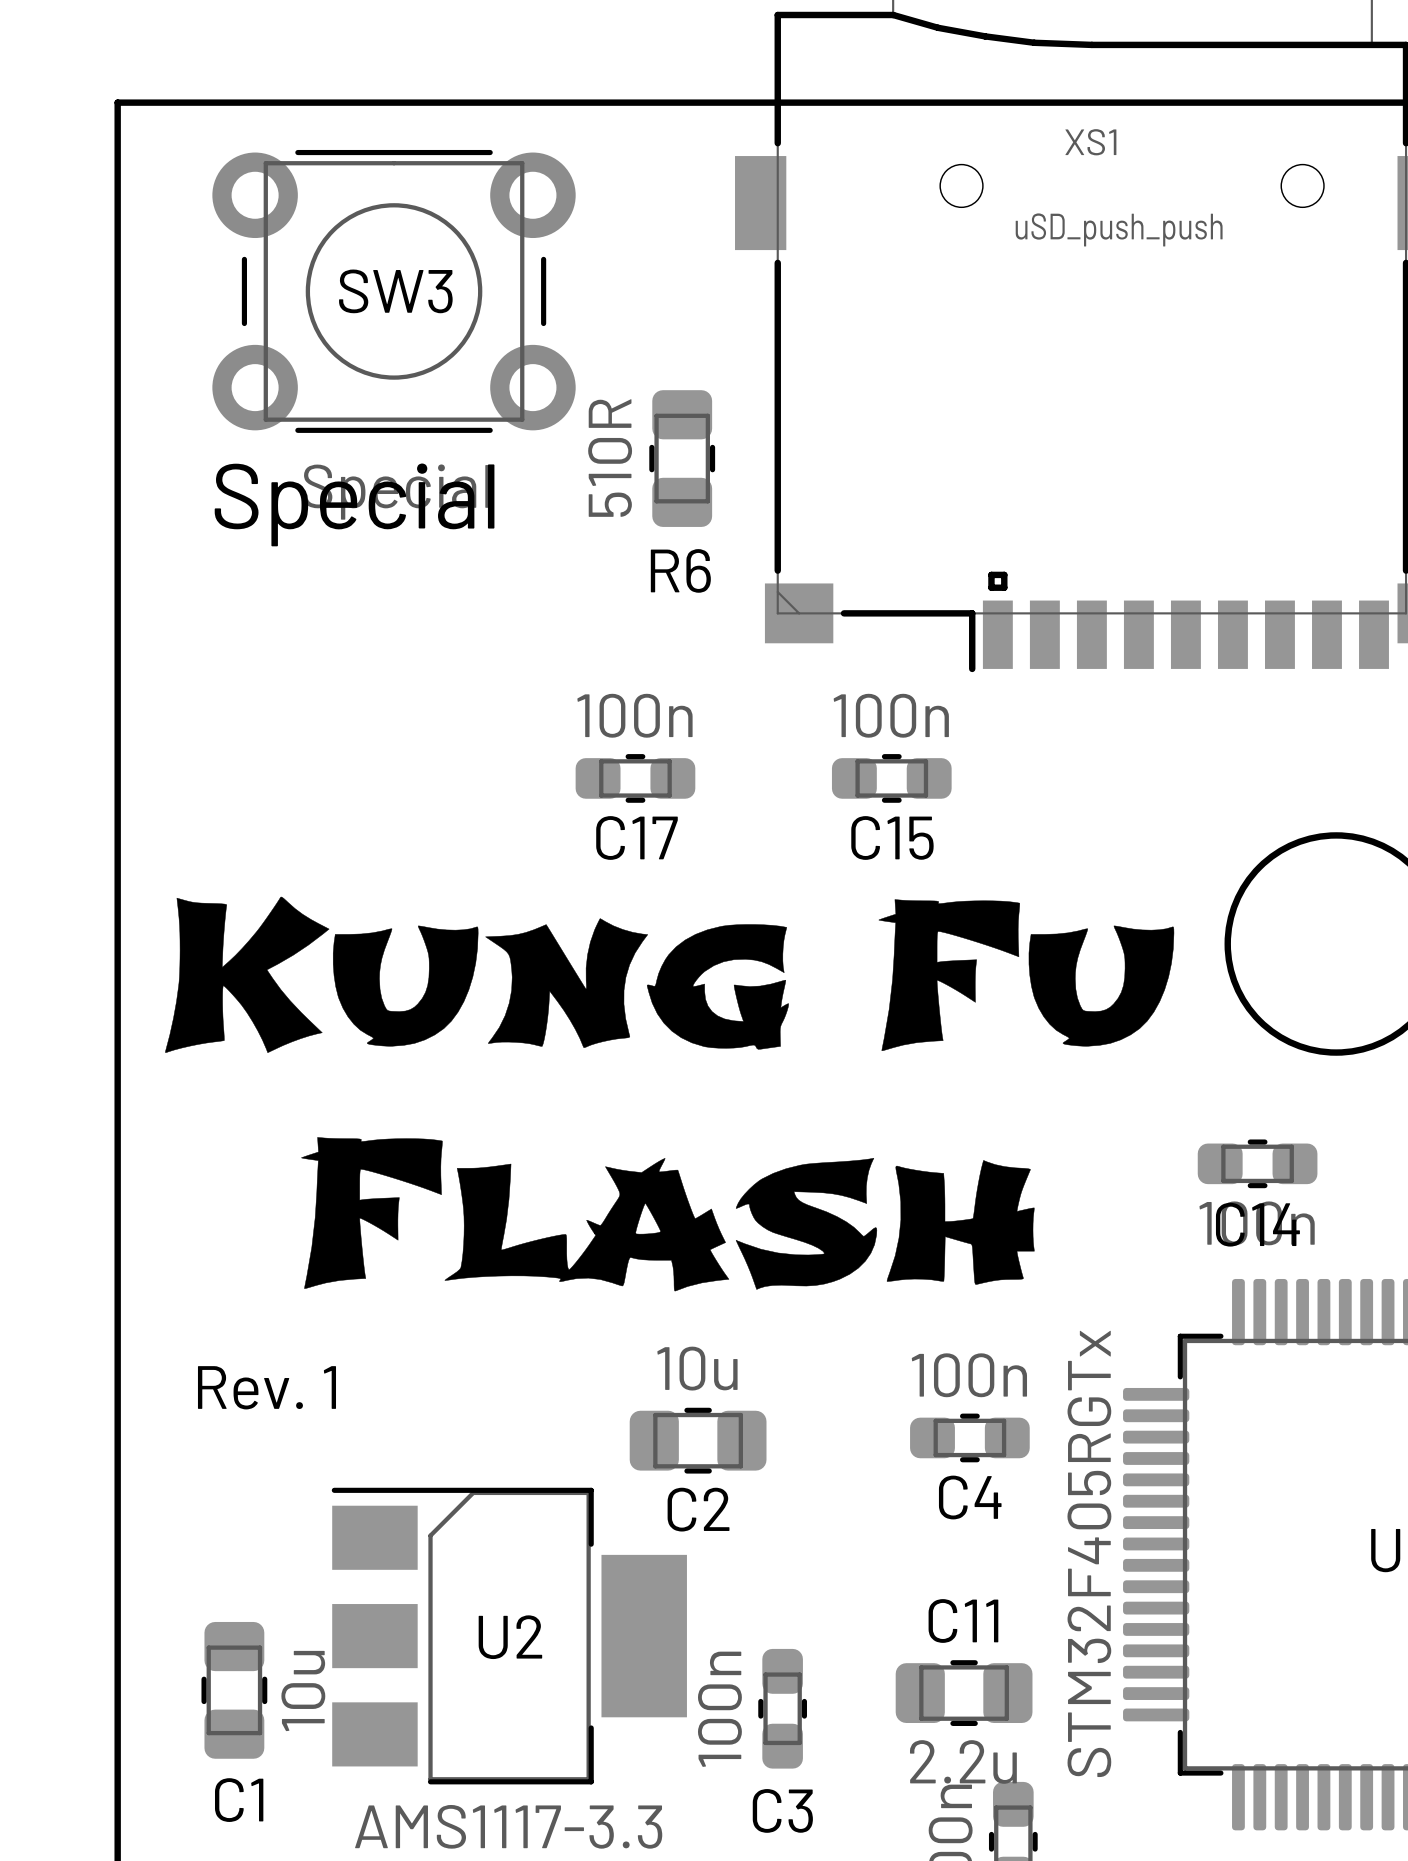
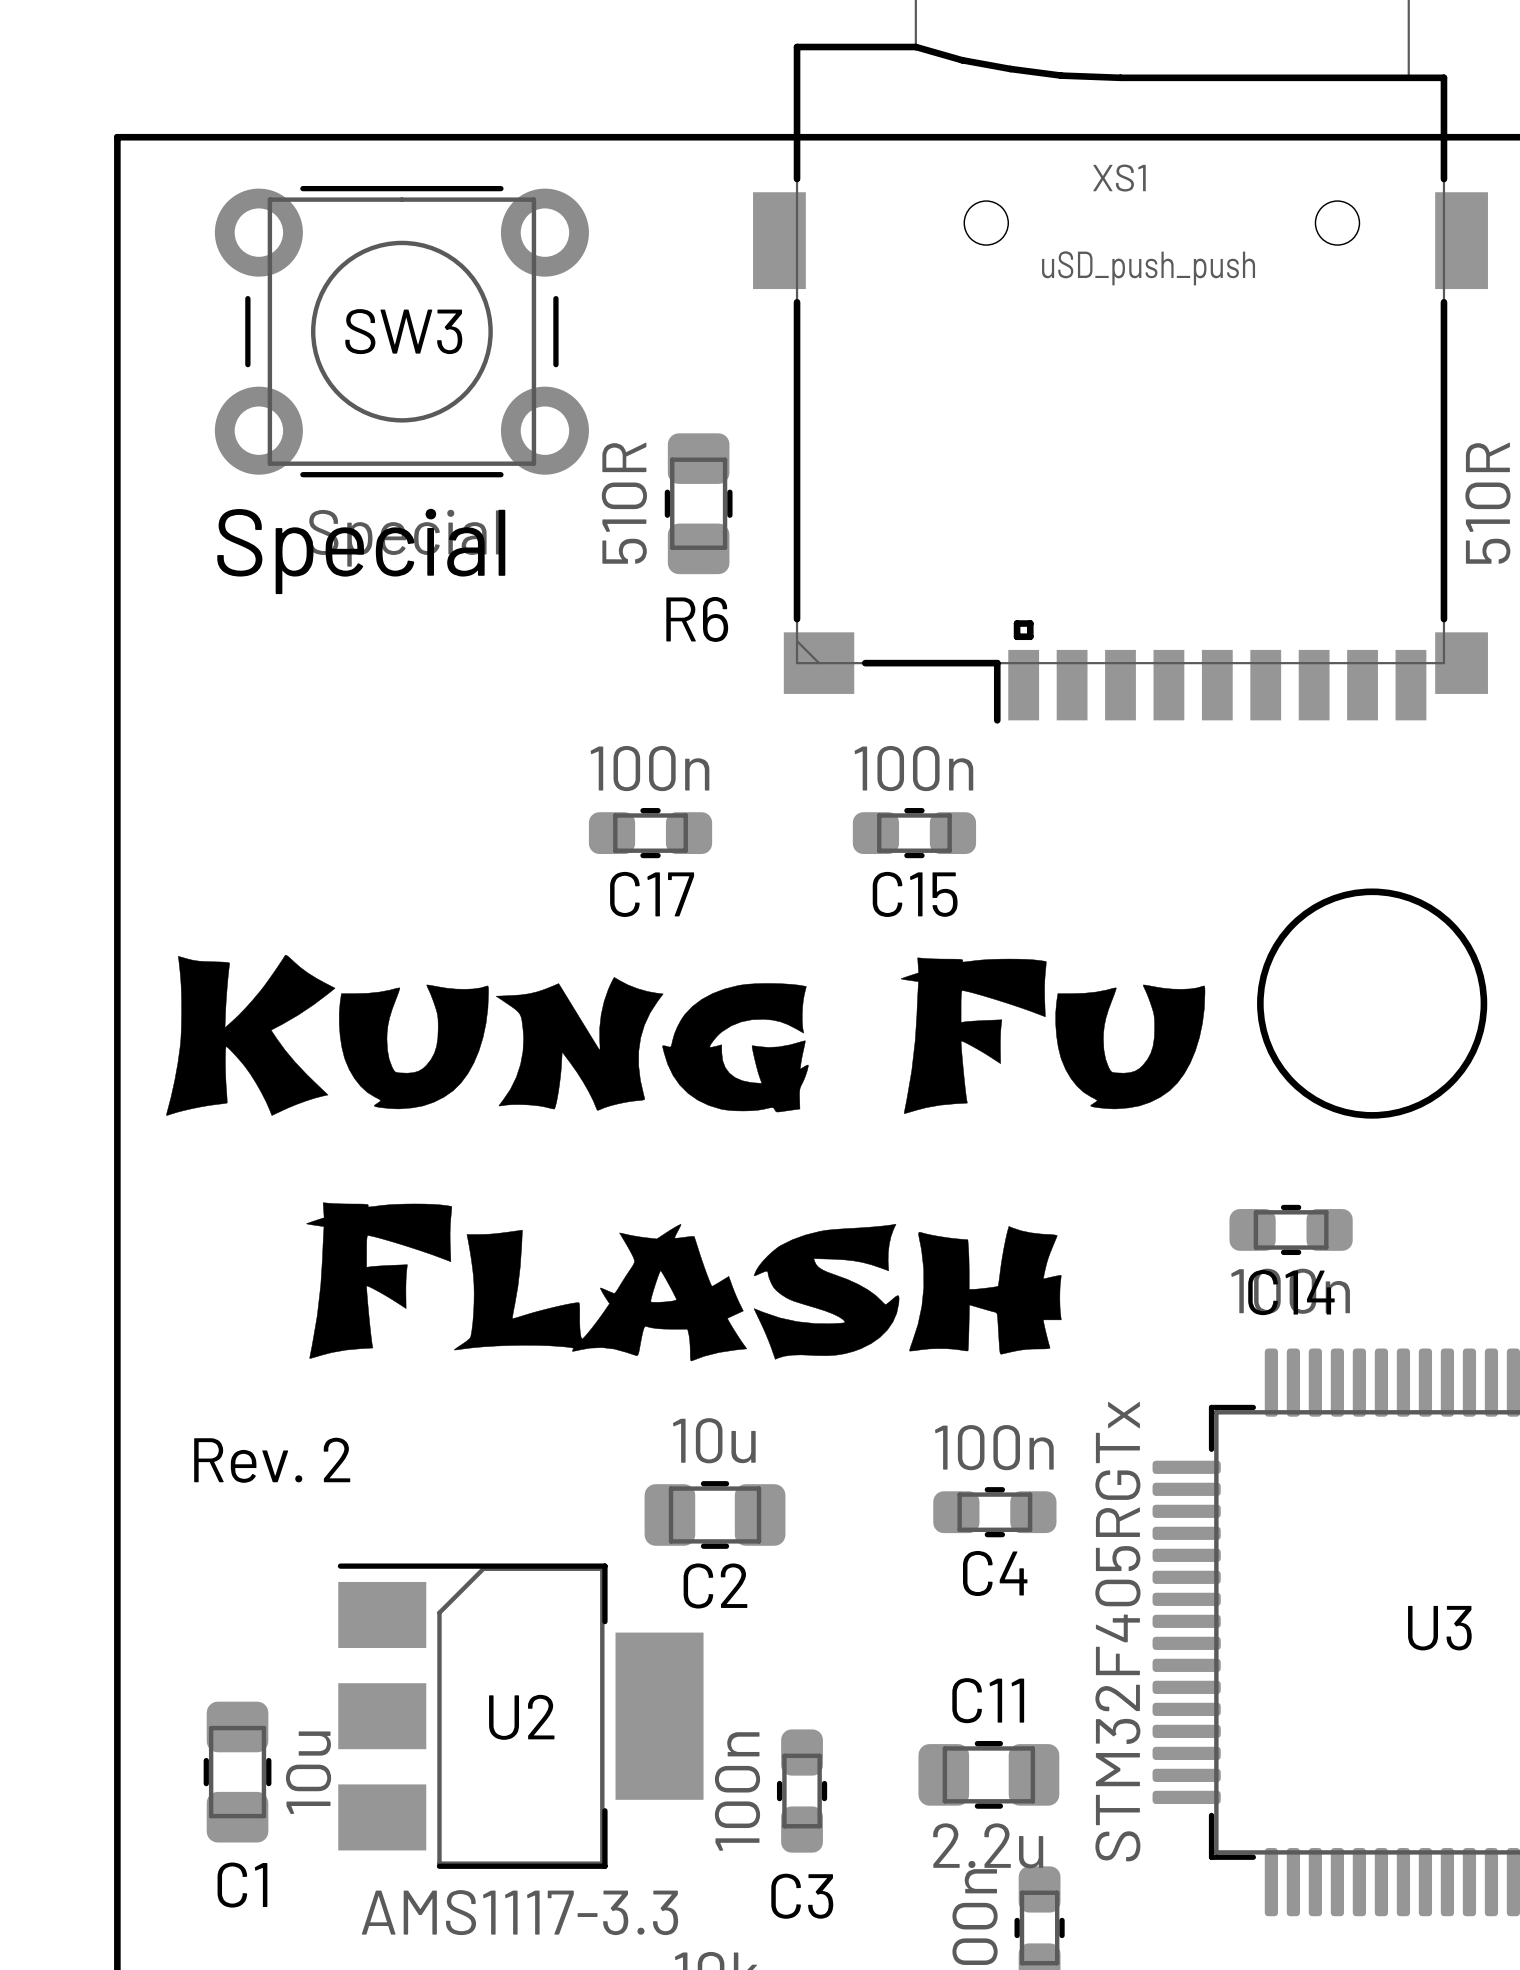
text: Rev. 1 (266, 1387) -> Rev. 2 (272, 1460)

